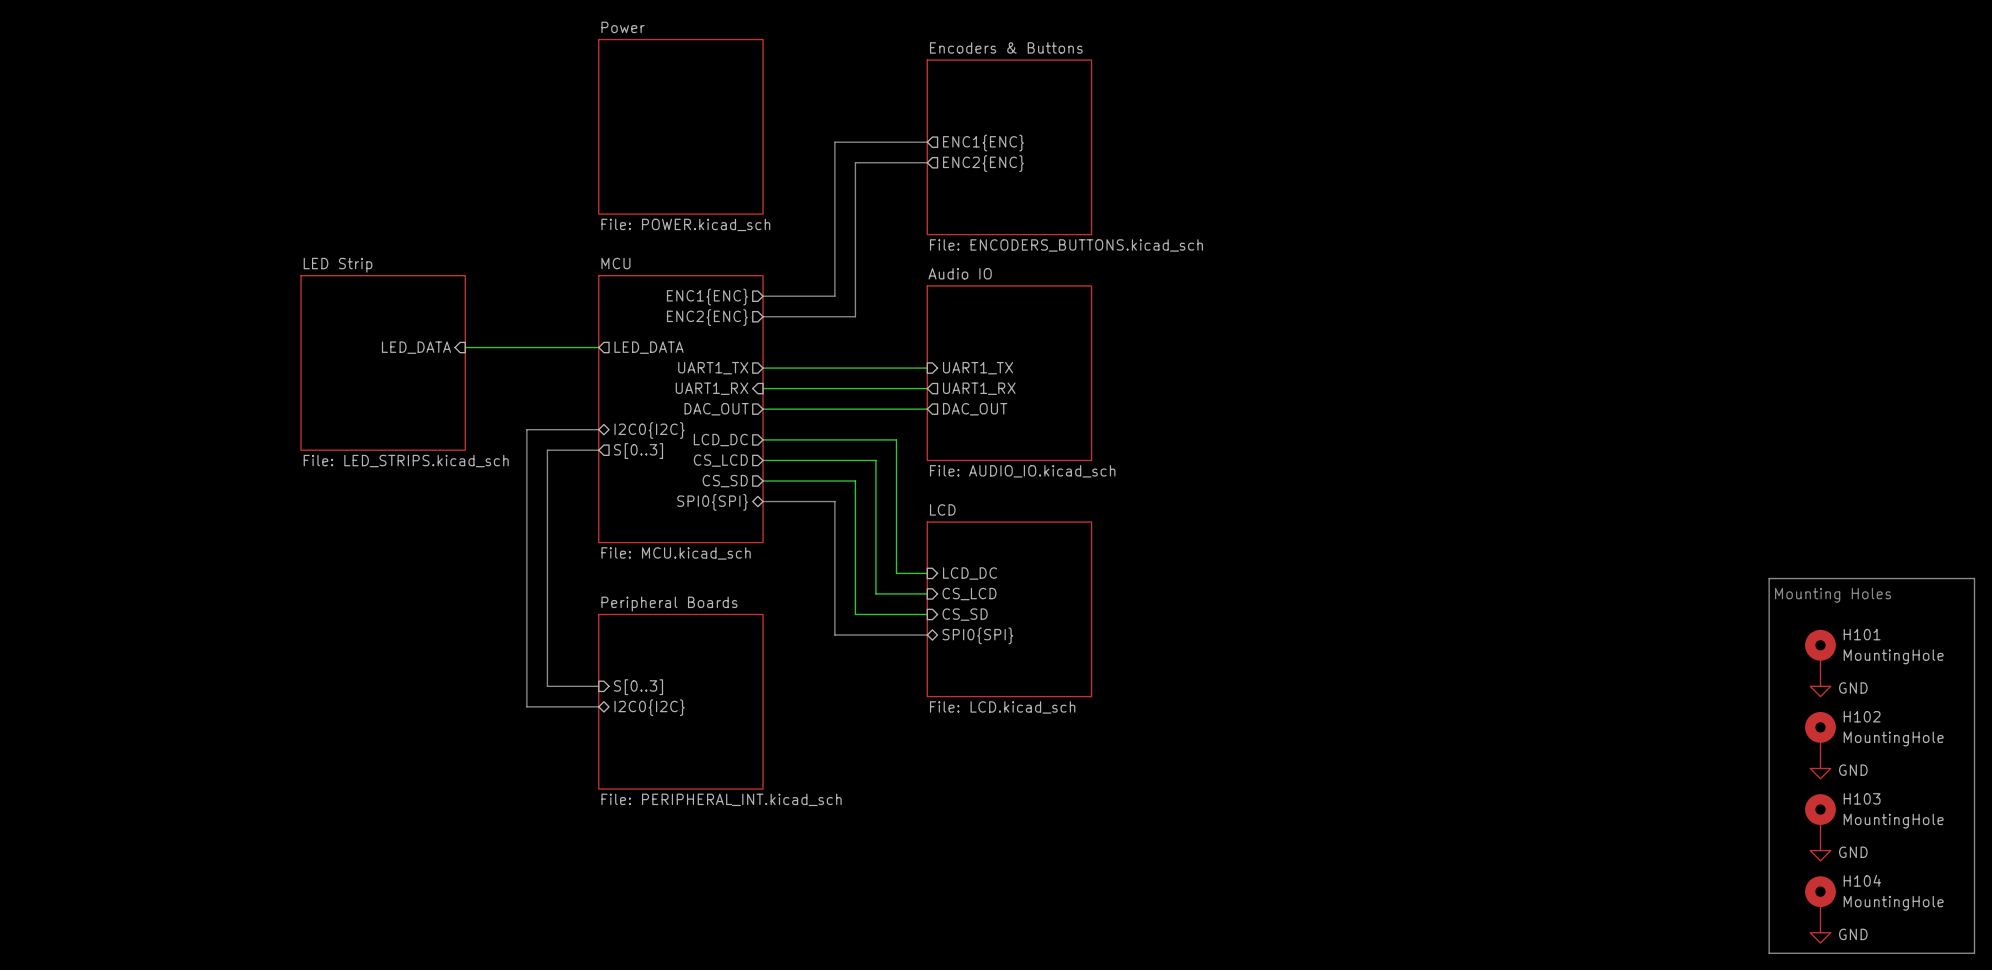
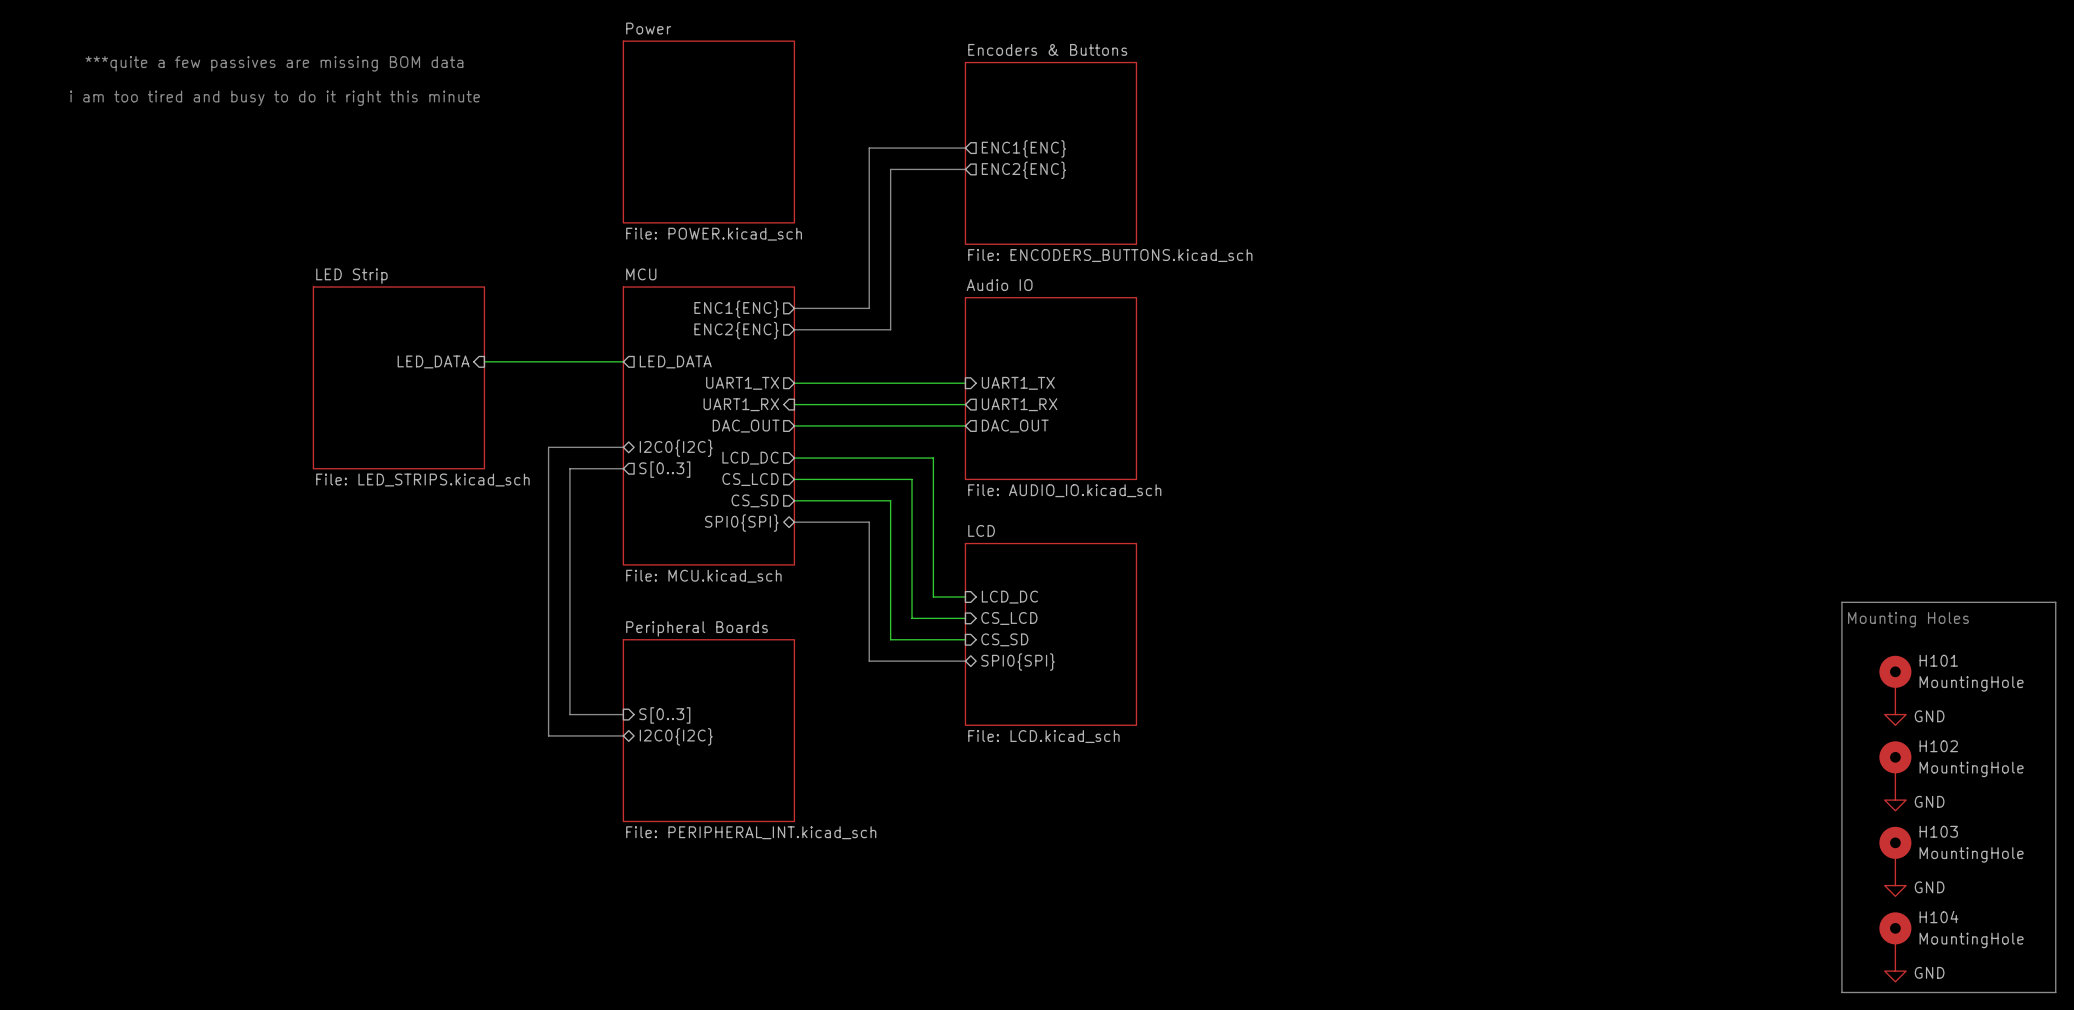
text: none -> ***quite a few passives are missing BOM data (274, 63)
text: none -> i am too tired and busy to do it right this minute (274, 98)

